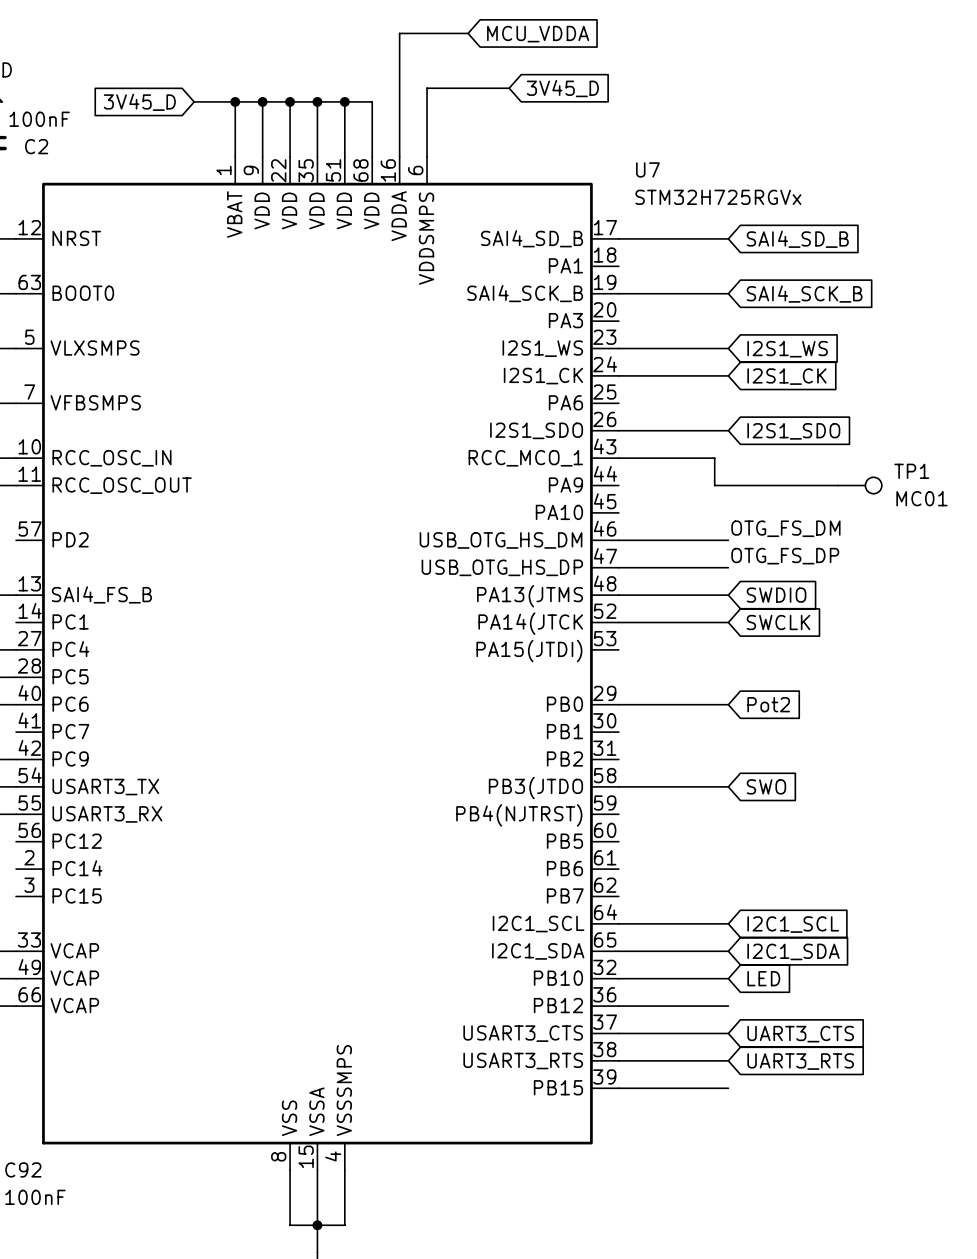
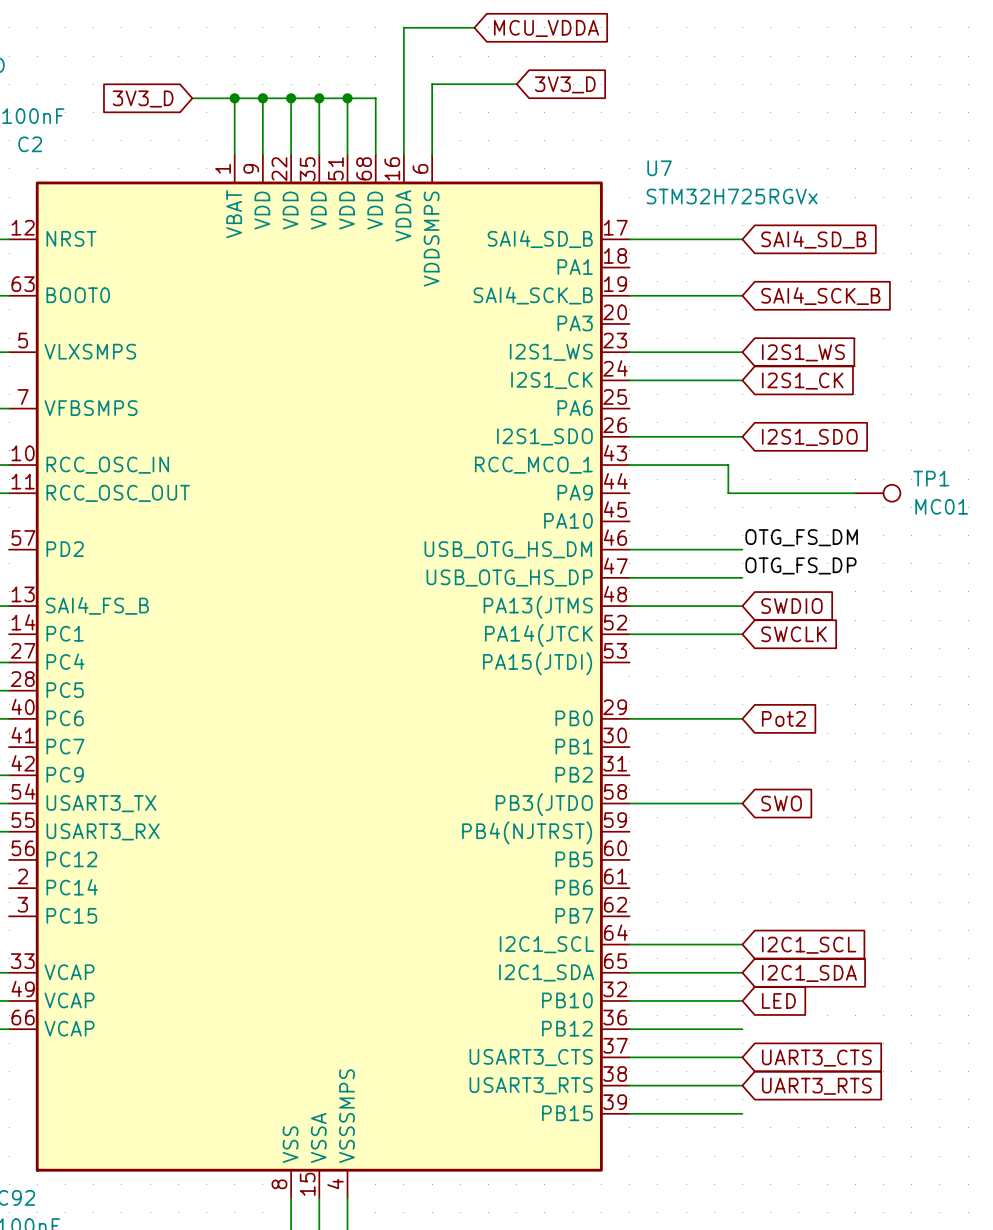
global label: 3V45_D (562, 88) -> 3V3_D (565, 84)
global label: 3V45_D (139, 102) -> 3V3_D (143, 98)

